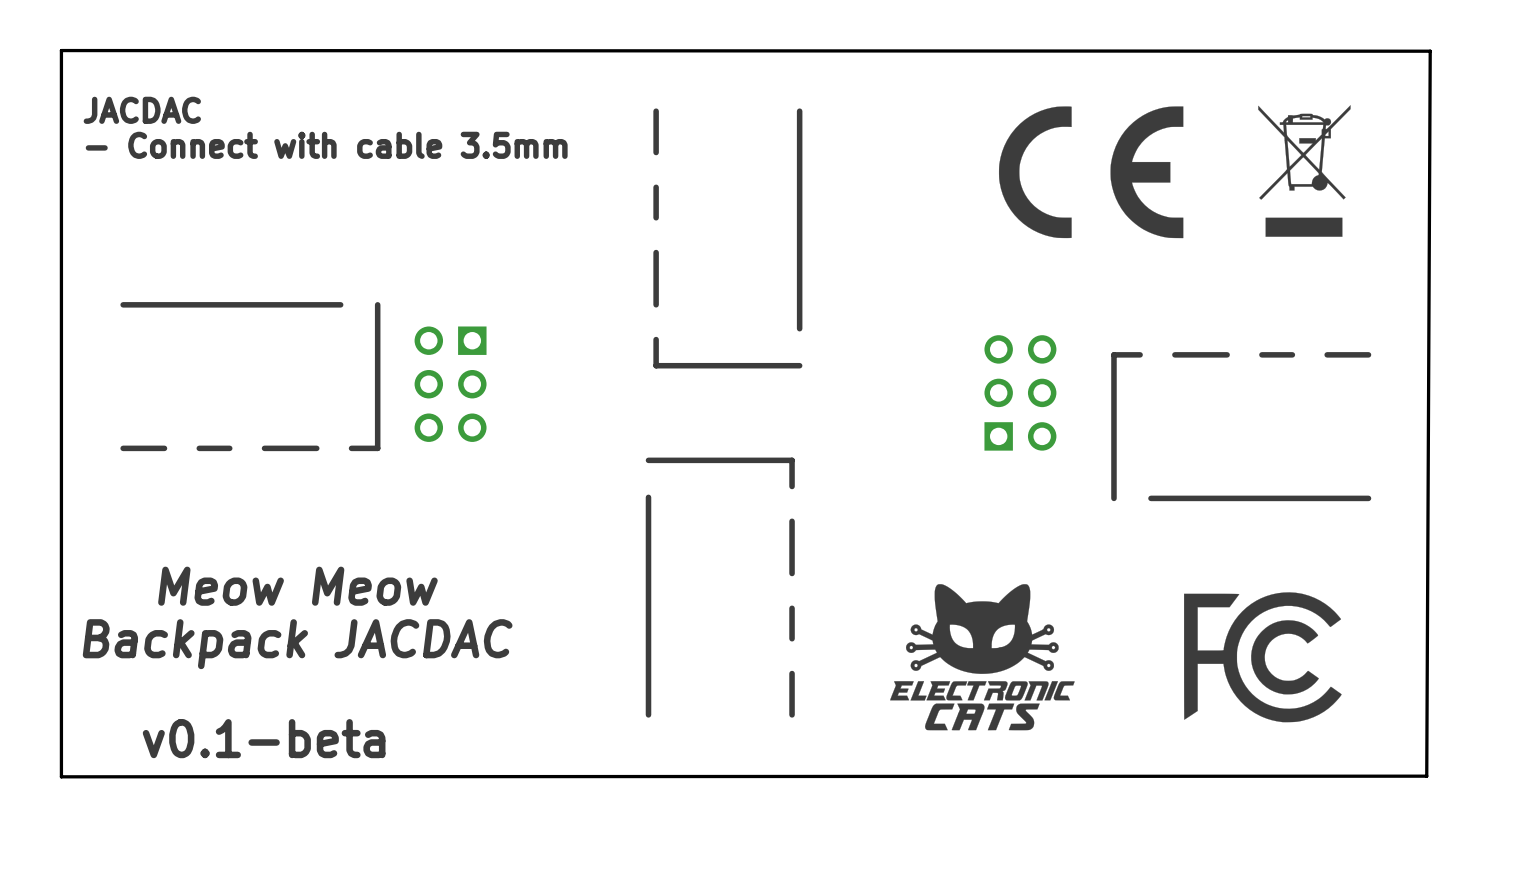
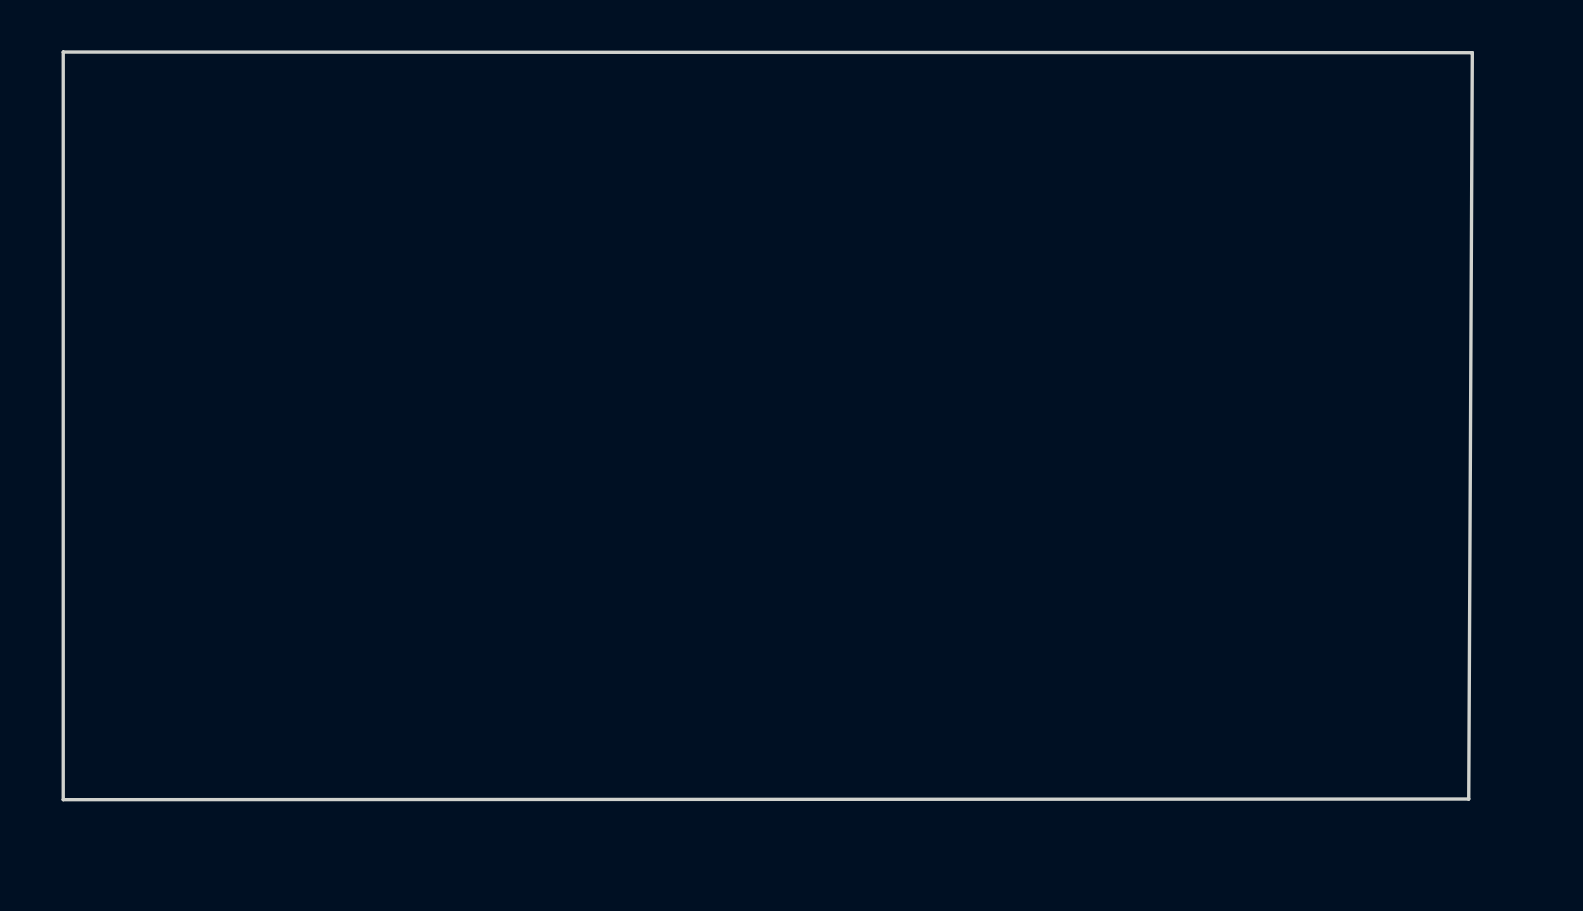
drawing: [1258, 105, 1351, 237] -> none
drawing: [998, 106, 1184, 239] -> none
text: JACDAC (142, 110) -> none
text: - Connect with cable 3.5mm (326, 145) -> none
part: (727, 238) -> none
part: (250, 376) -> none
part: (450, 384) -> none
part: (1020, 392) -> none
part: (1241, 426) -> none
drawing: [890, 584, 1075, 731] -> none
text: Meow Meow (297, 586) -> none
part: (720, 587) -> none
drawing: [1184, 592, 1342, 723] -> none
text: Backpack JACDAC (297, 644) -> none
text: v0.1-beta (264, 738) -> none

